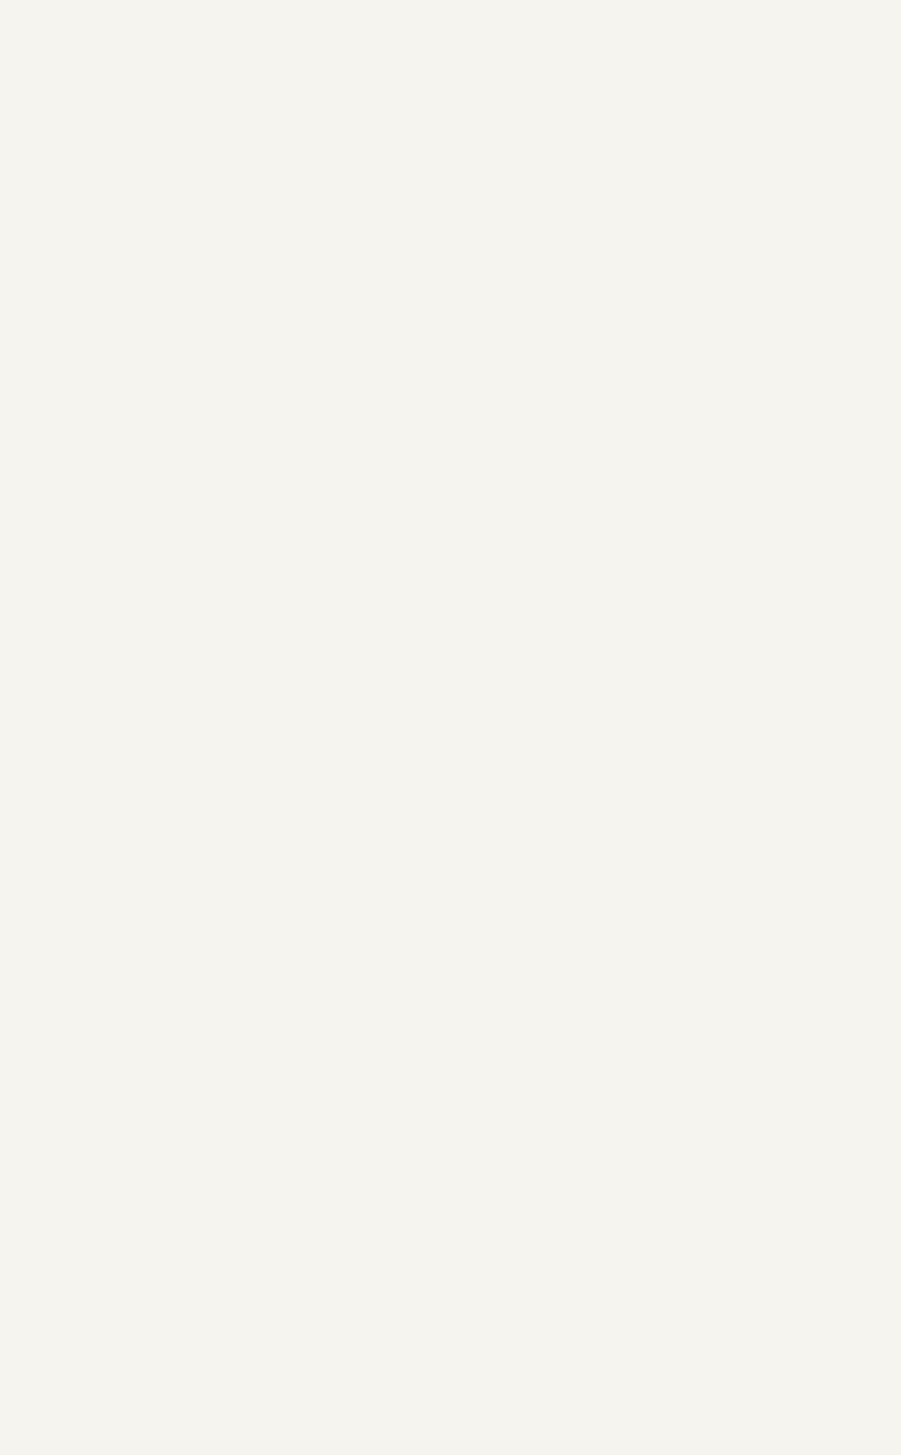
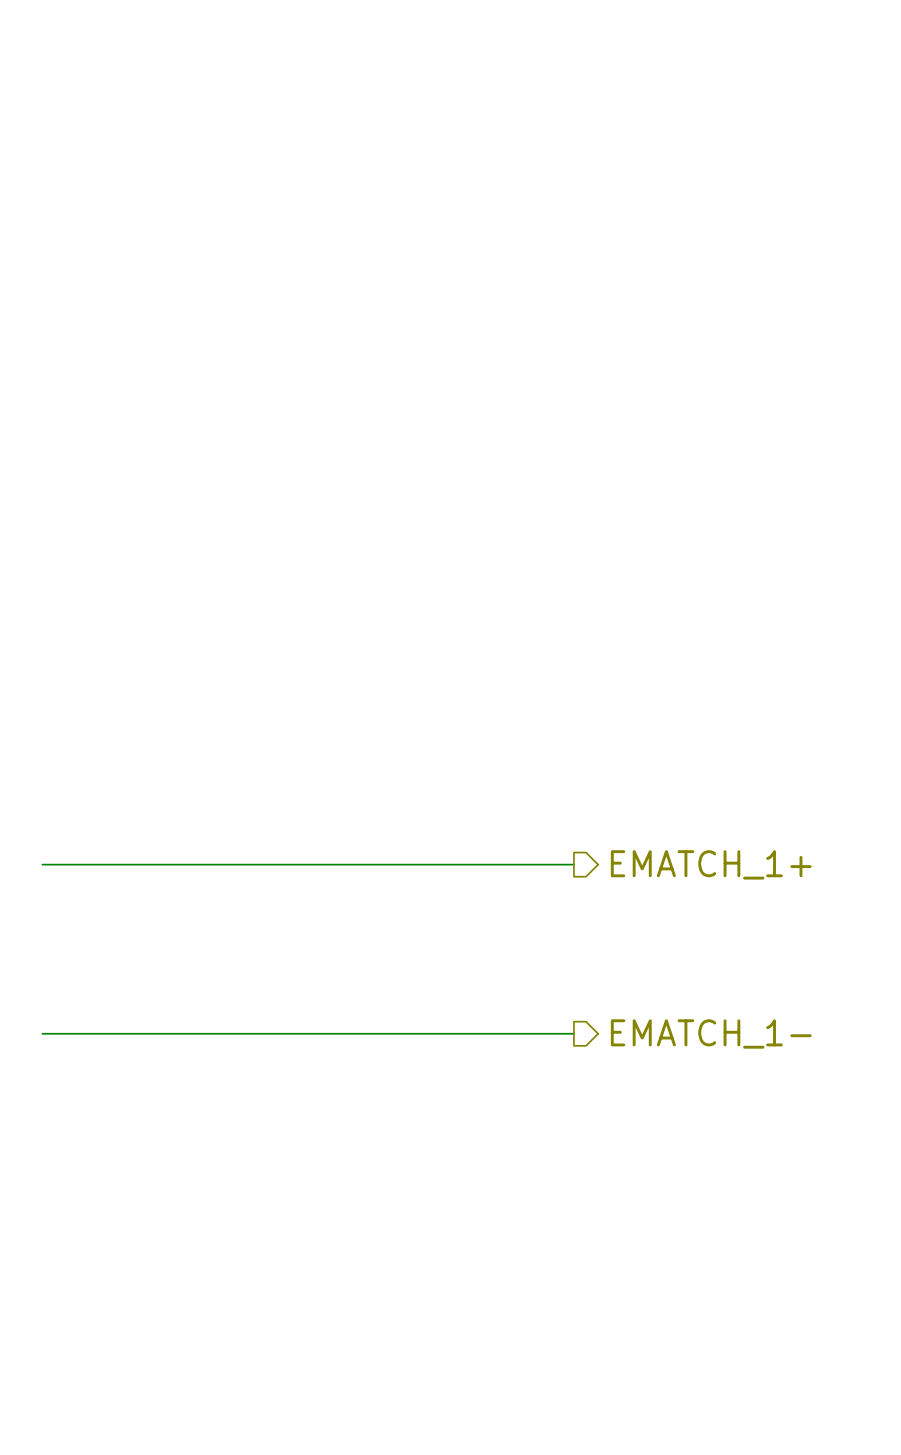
wire: none -> (42, 864) (573, 864)
hierarchical label: none -> EMATCH_1+ (711, 864)
wire: none -> (42, 1033) (573, 1033)
hierarchical label: none -> EMATCH_1- (711, 1034)

